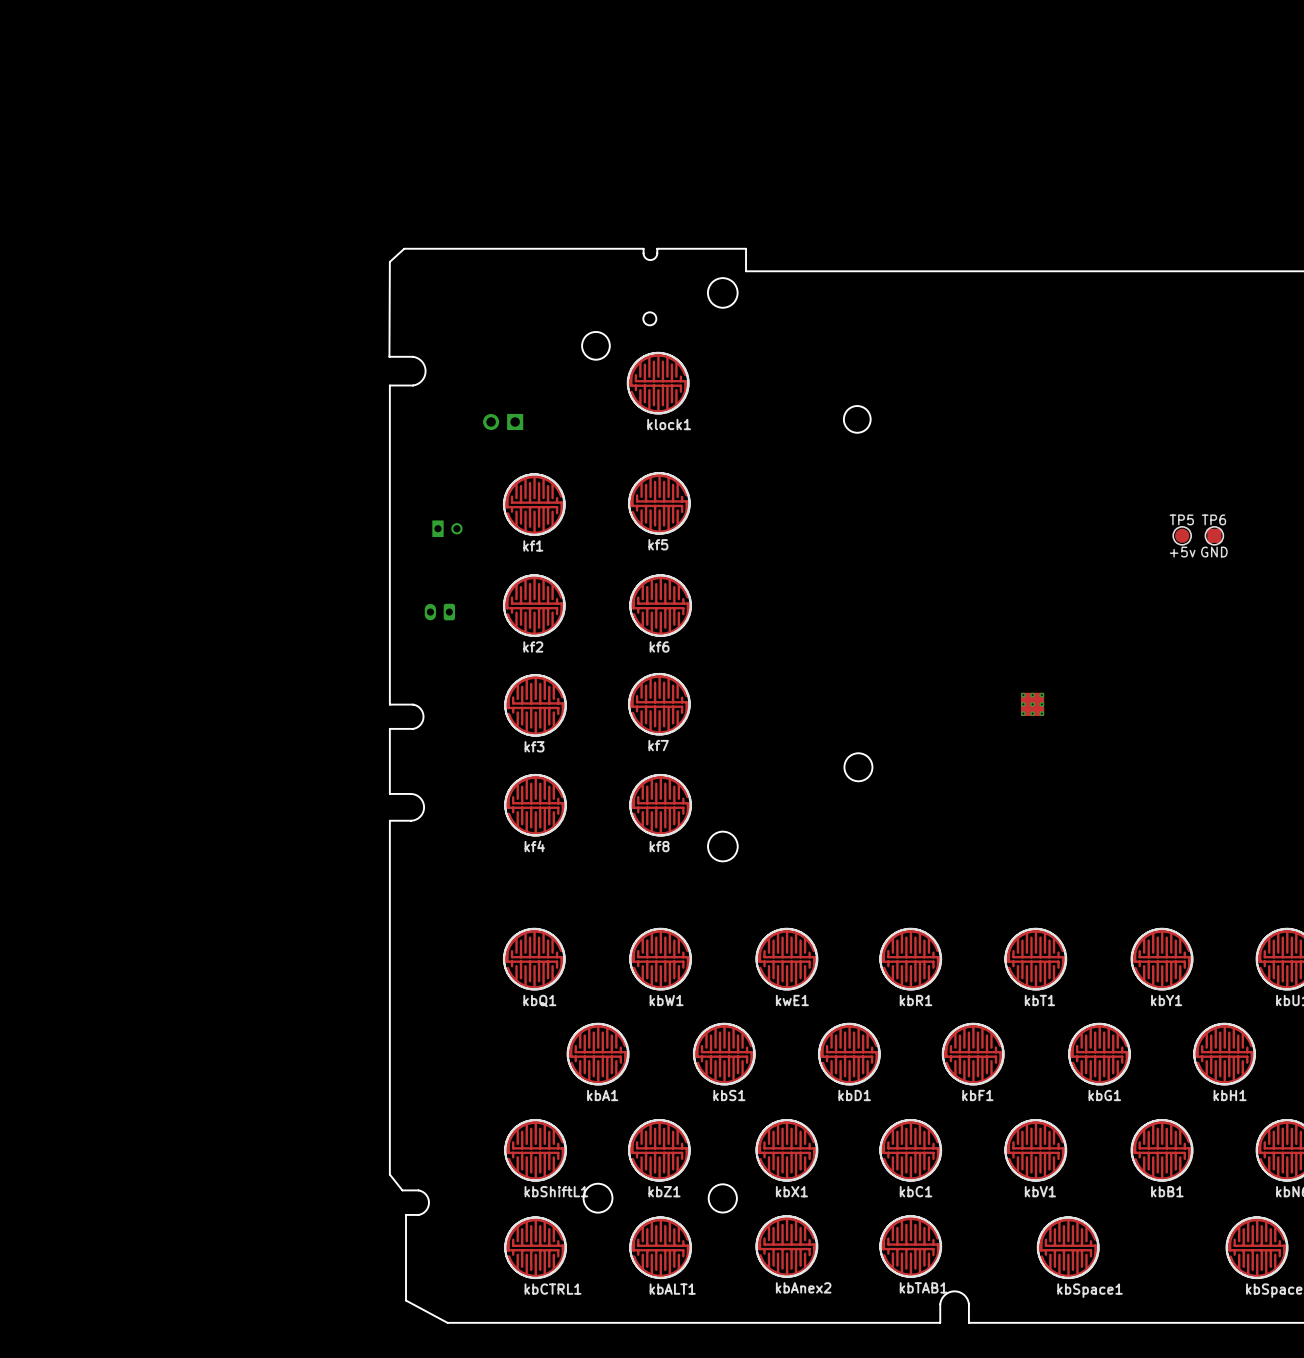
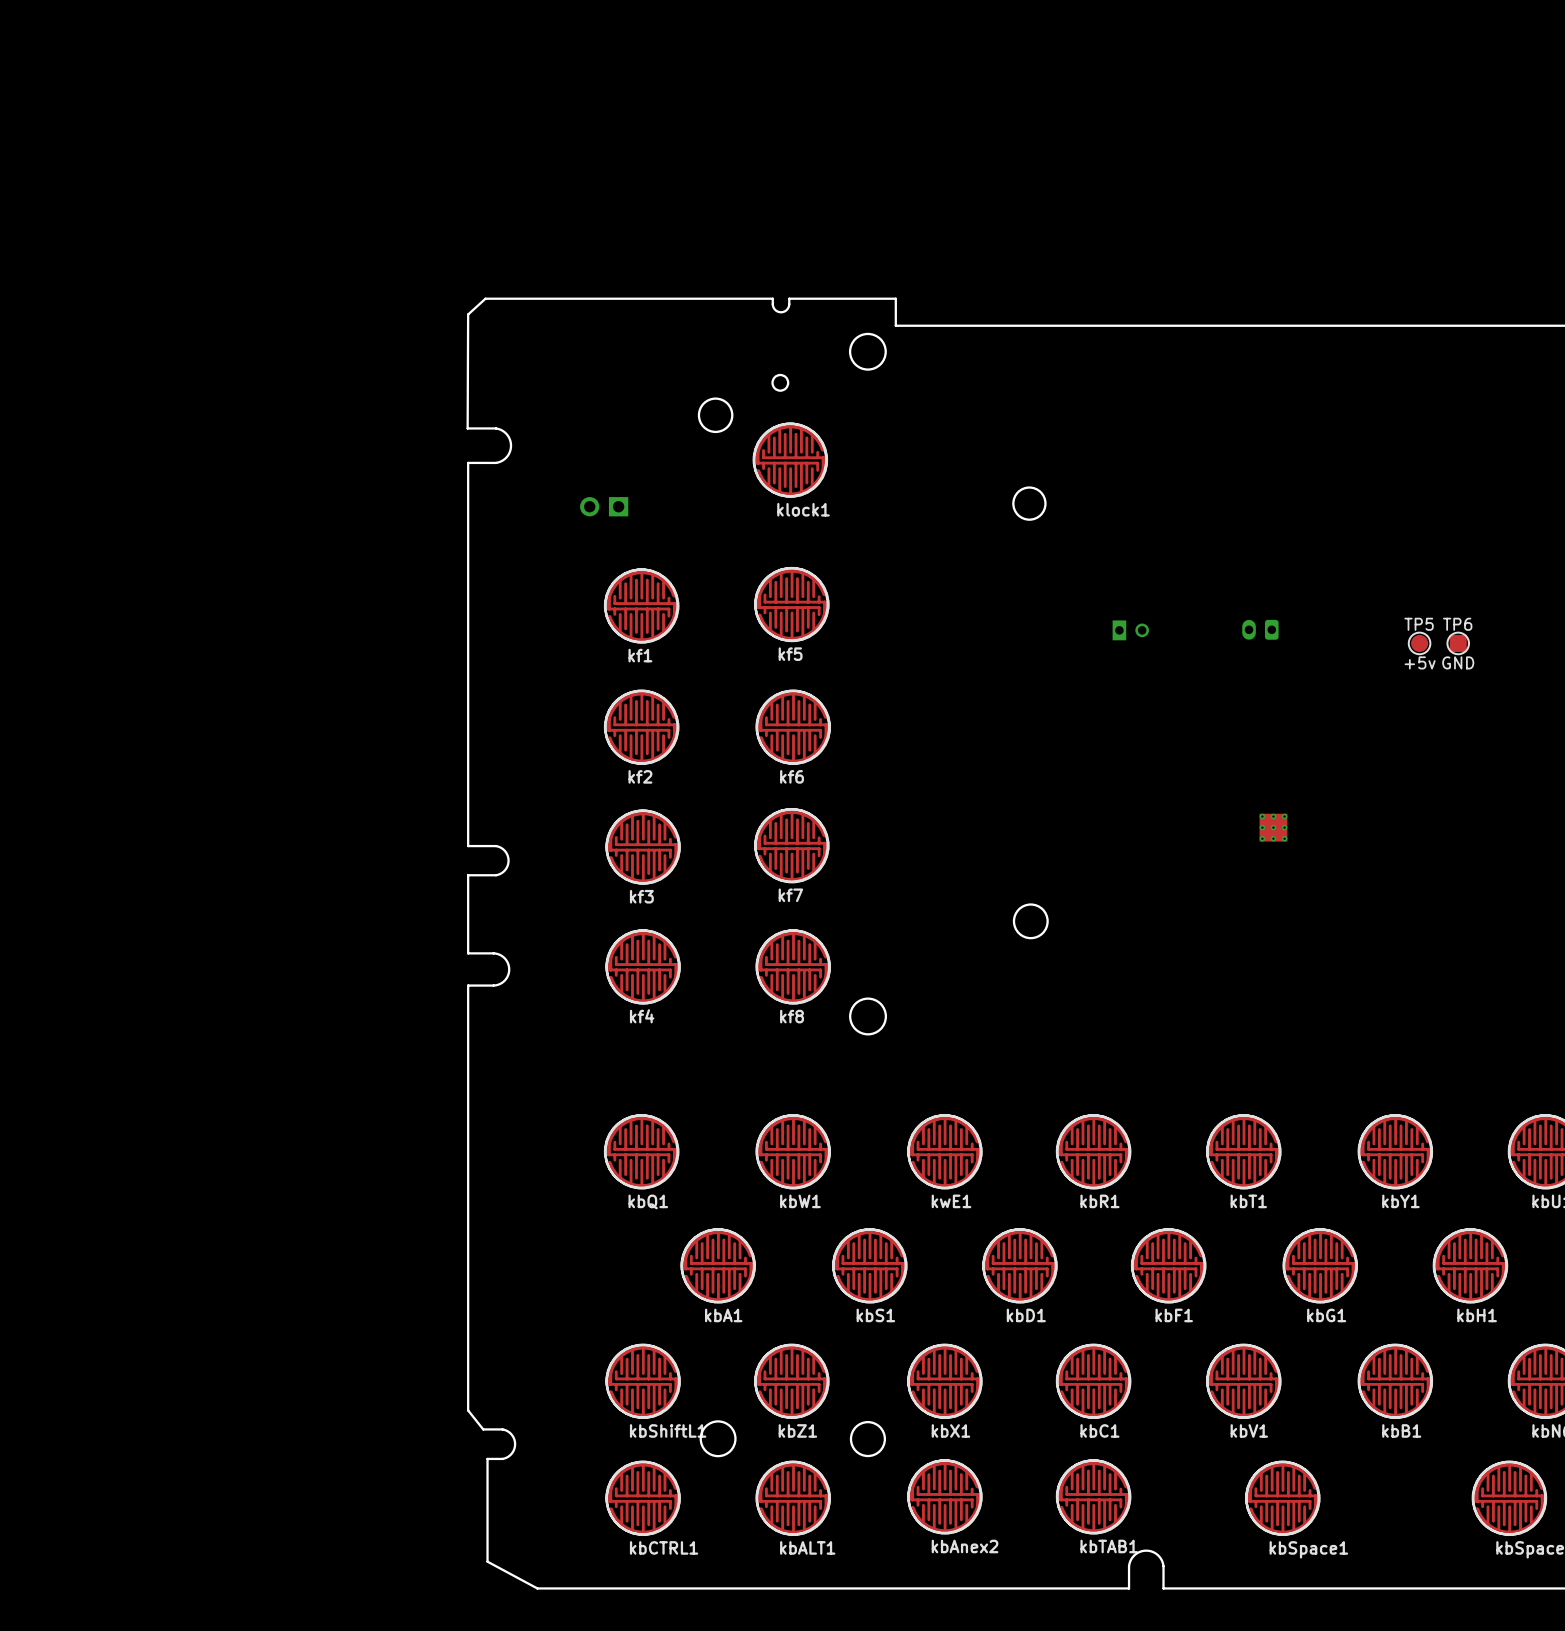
part: none -> (1130, 630)
part: none -> (1260, 629)
part: (447, 528) -> none
part: (439, 612) -> none
part position: (1032, 704) -> (1273, 827)

